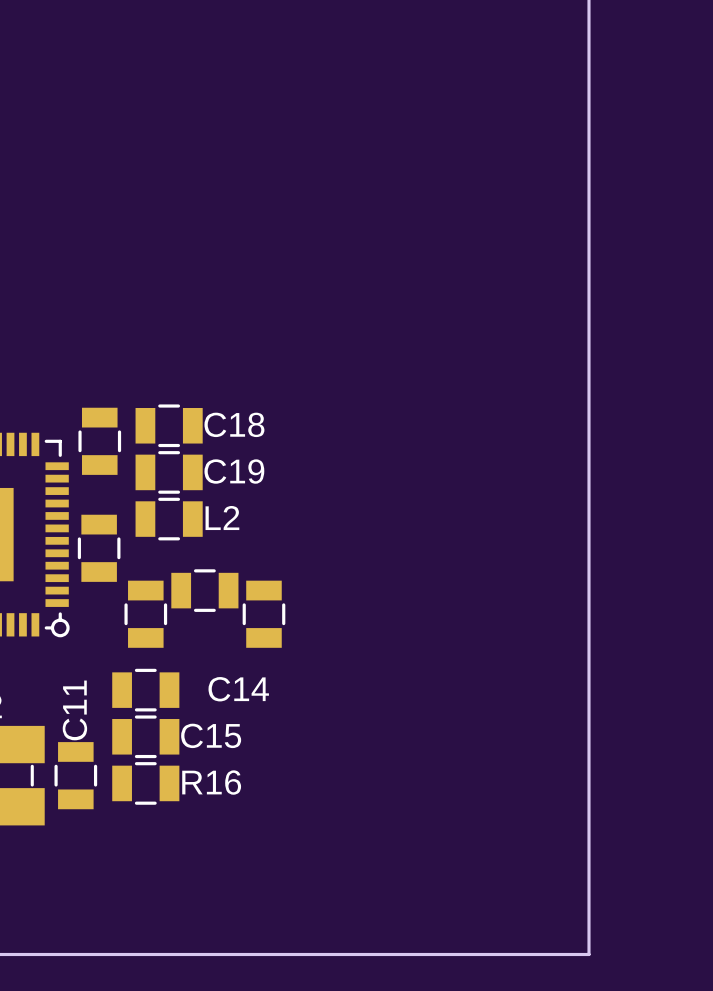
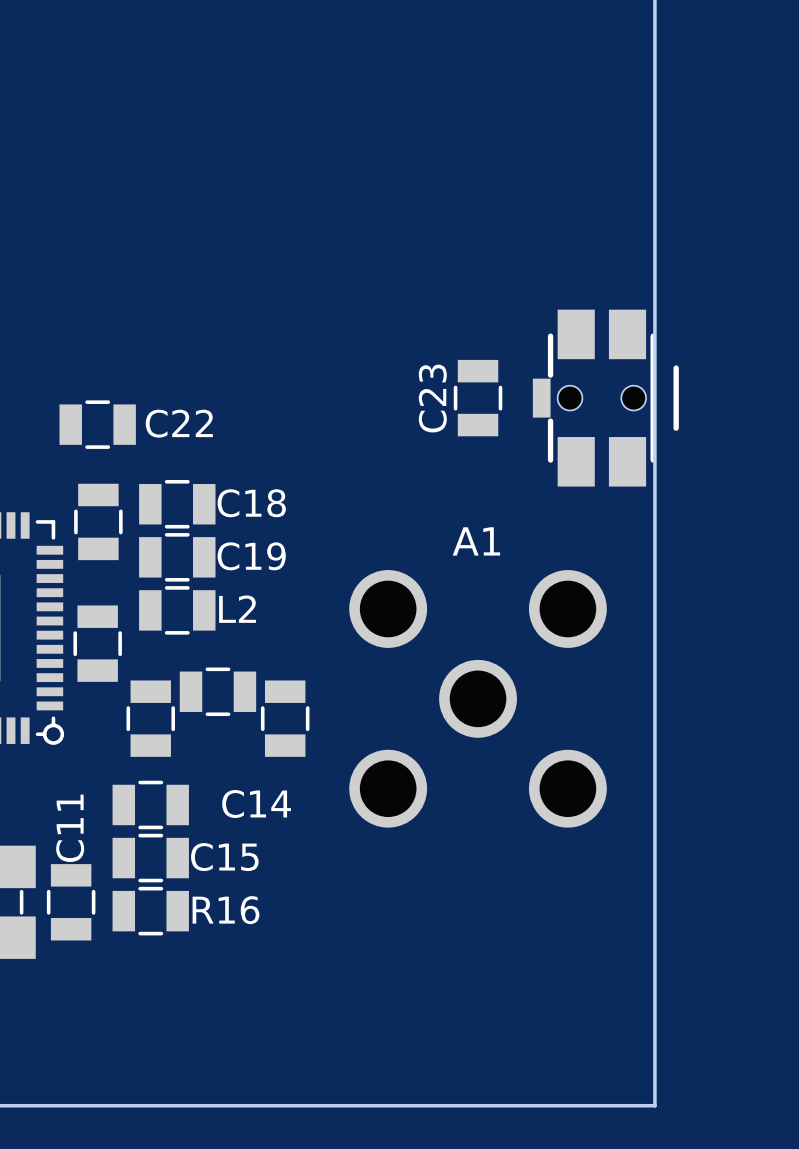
C23: none -> (478, 398)
part: none -> (605, 398)
C22: none -> (97, 424)
A1: none -> (478, 698)

